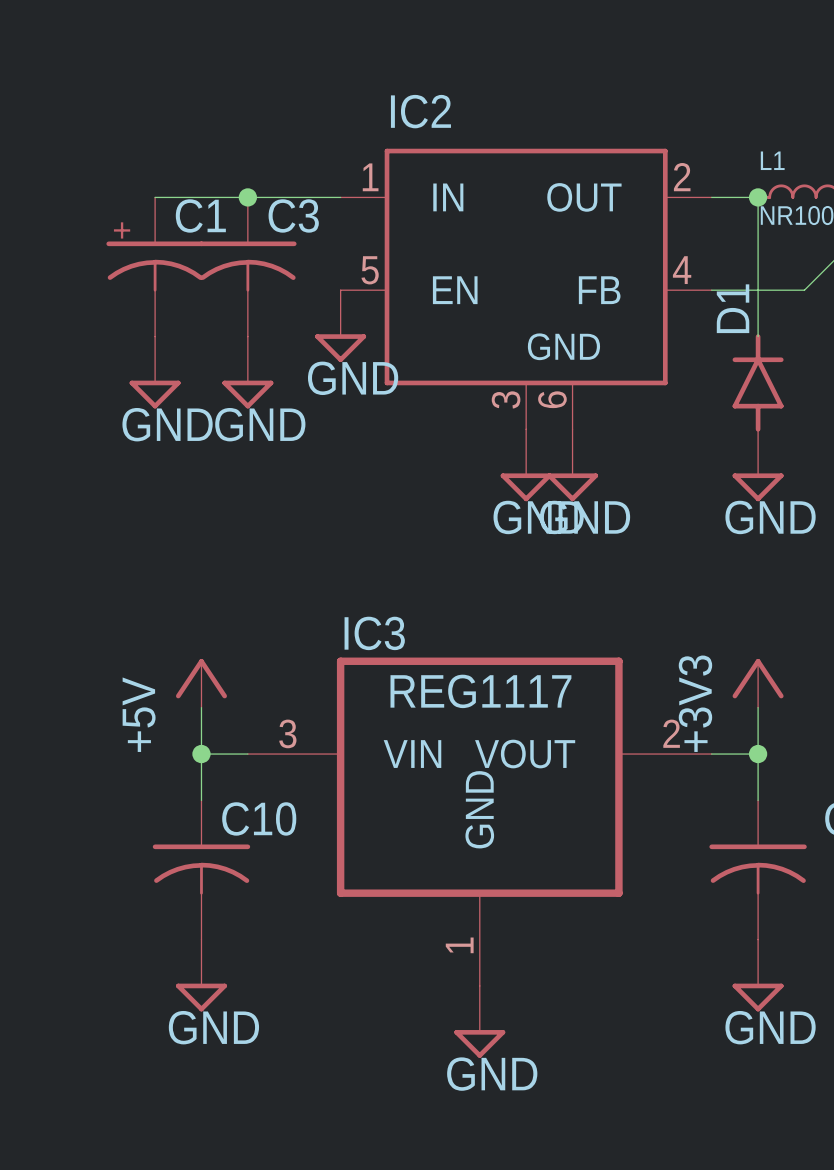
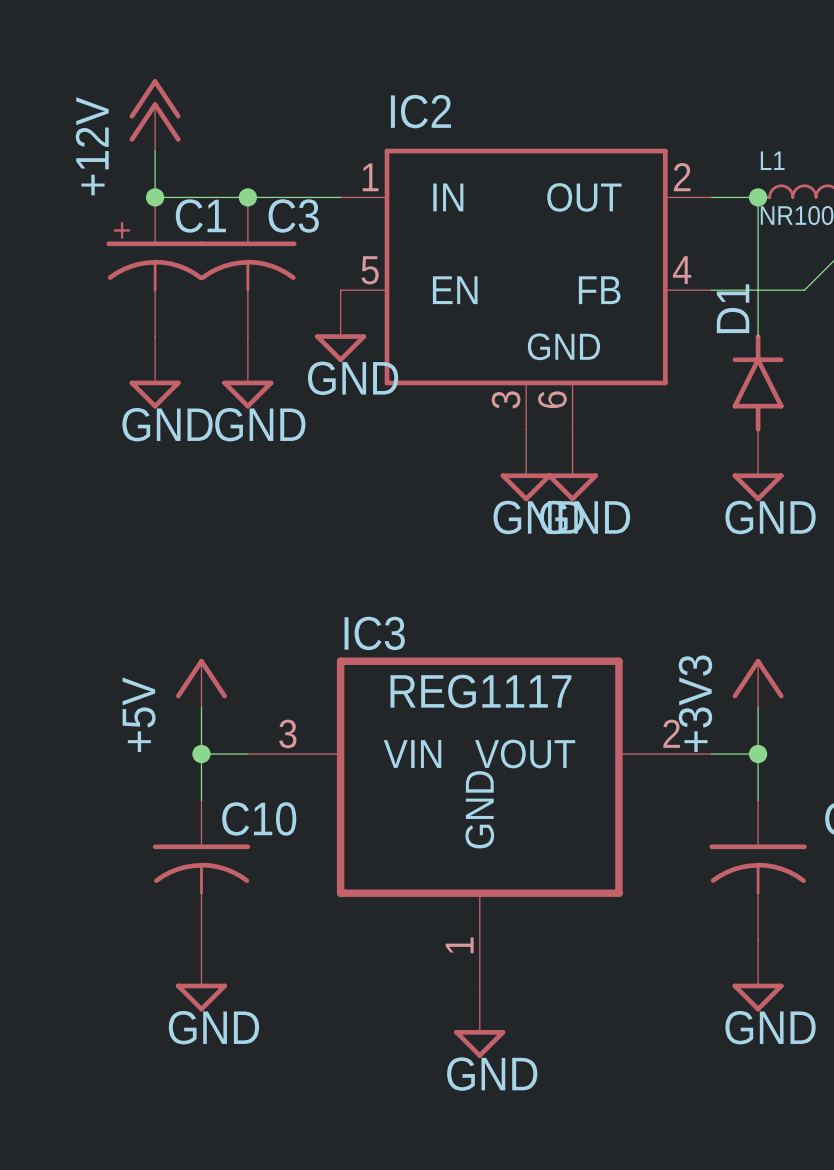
power symbol: none -> +12V (155, 115)
wire: none -> (155, 151) (155, 197)
junction: none -> (155, 197)

